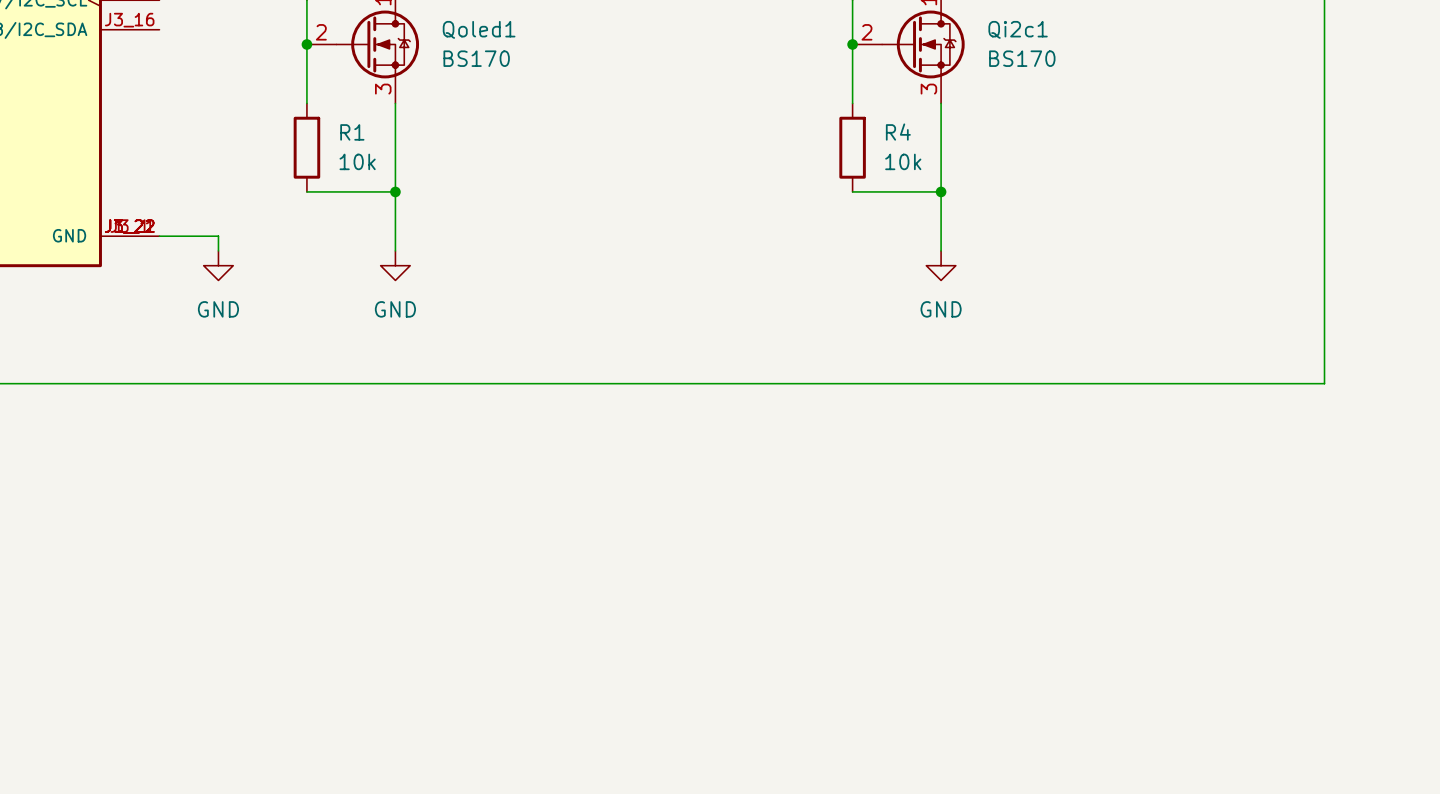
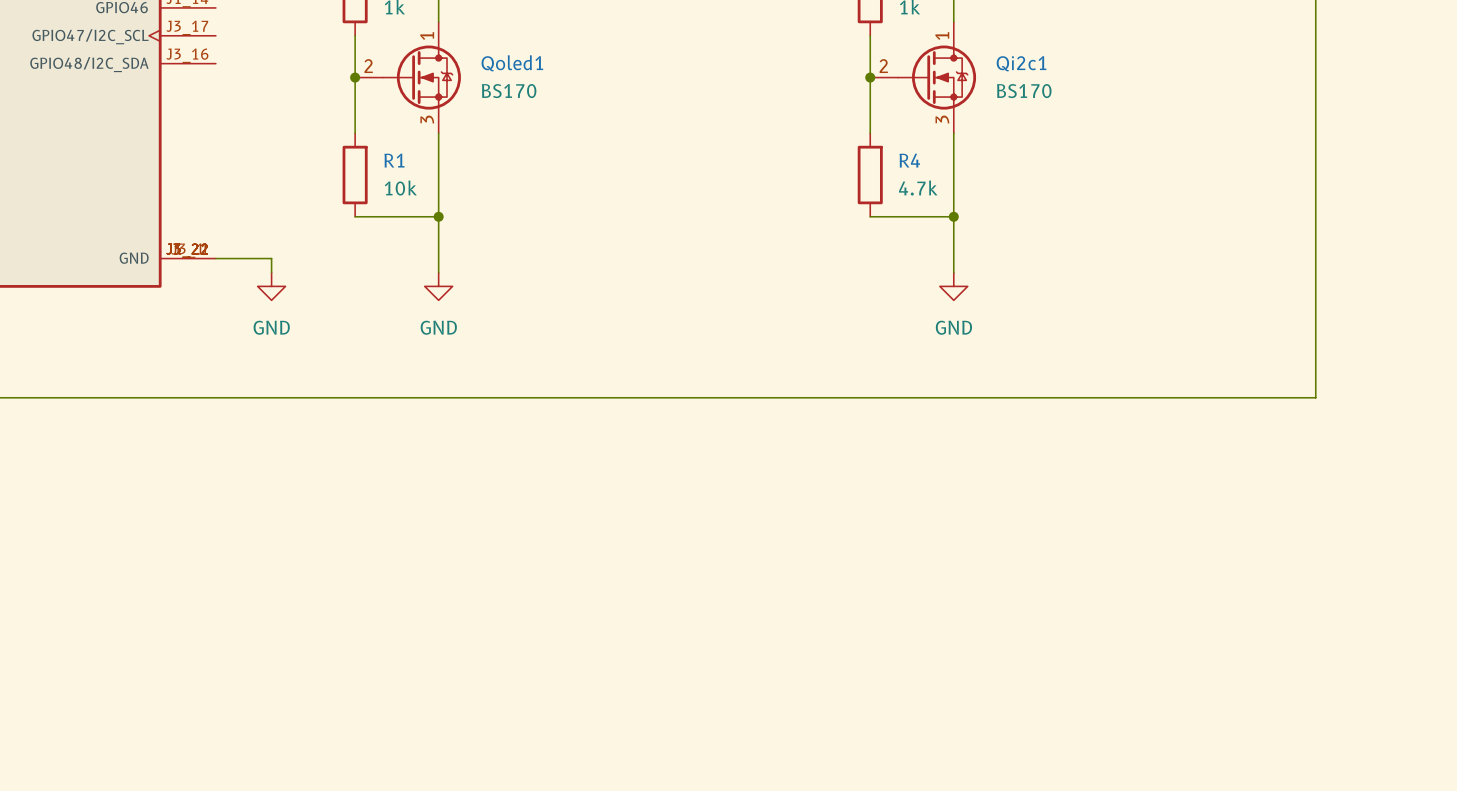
R4 value: 10k (903, 161) -> 4.7k (918, 188)

